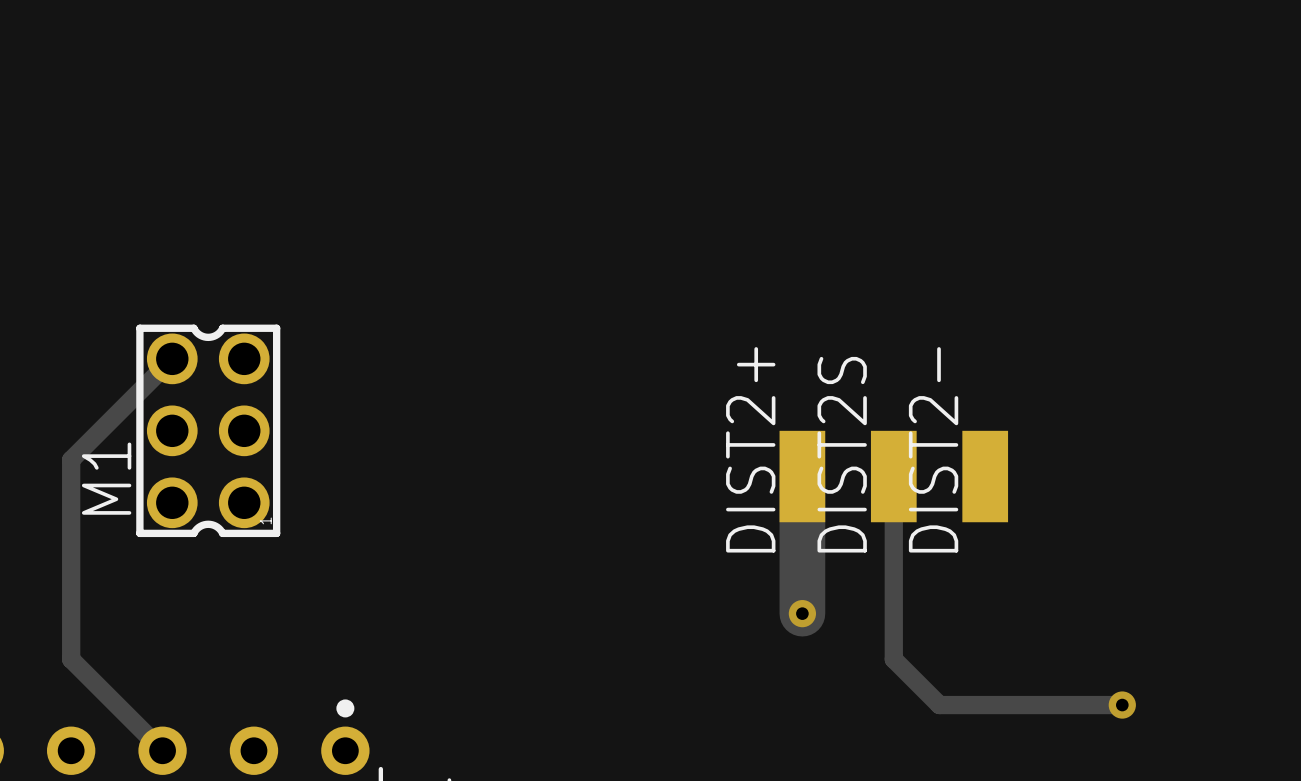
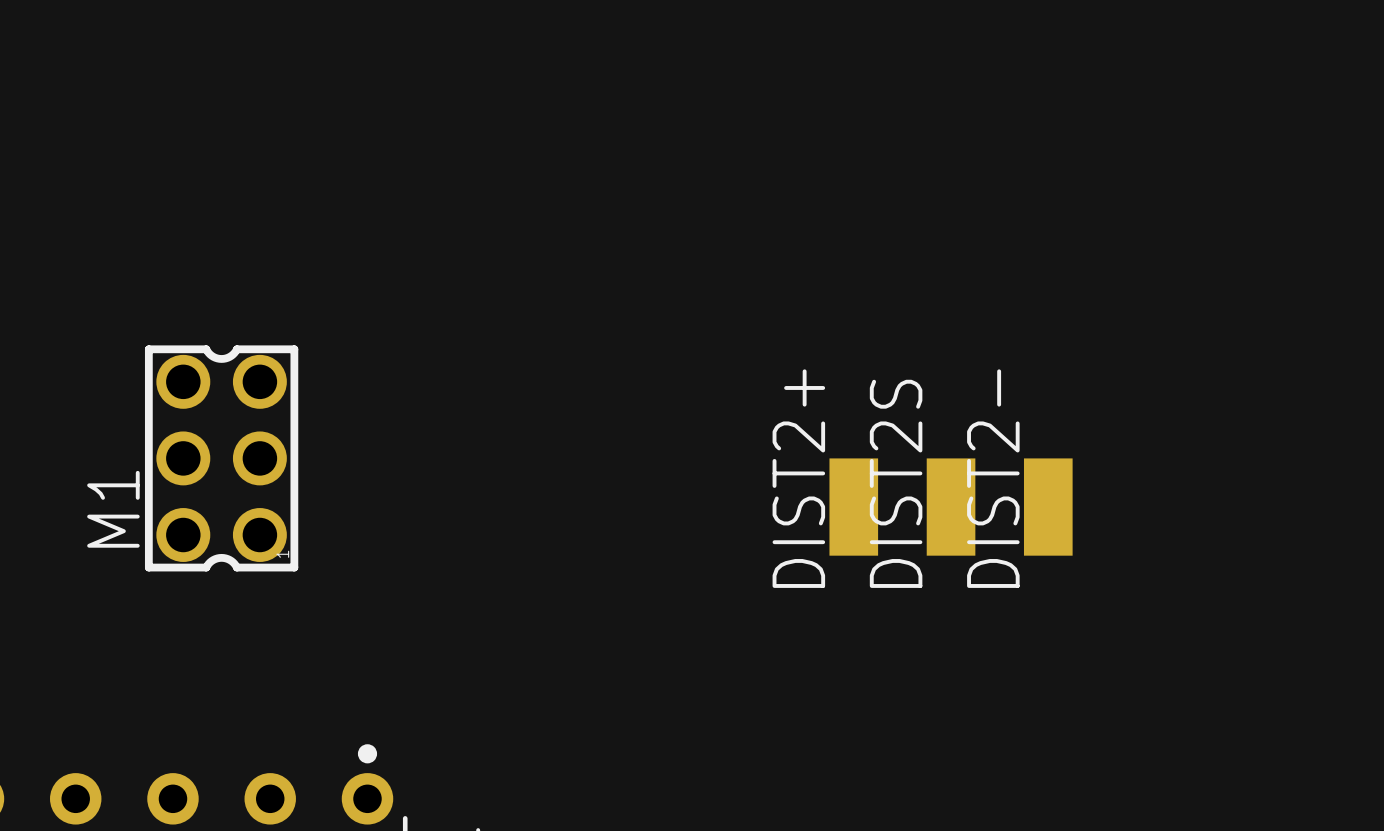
track: (172, 358) (71, 459) (71, 659) (162, 750) -> none
track: (802, 476) (802, 613) -> none
track: (893, 522) (893, 659) (939, 705) (1122, 705) -> none
via: (802, 613) -> none
via: (1122, 705) -> none

